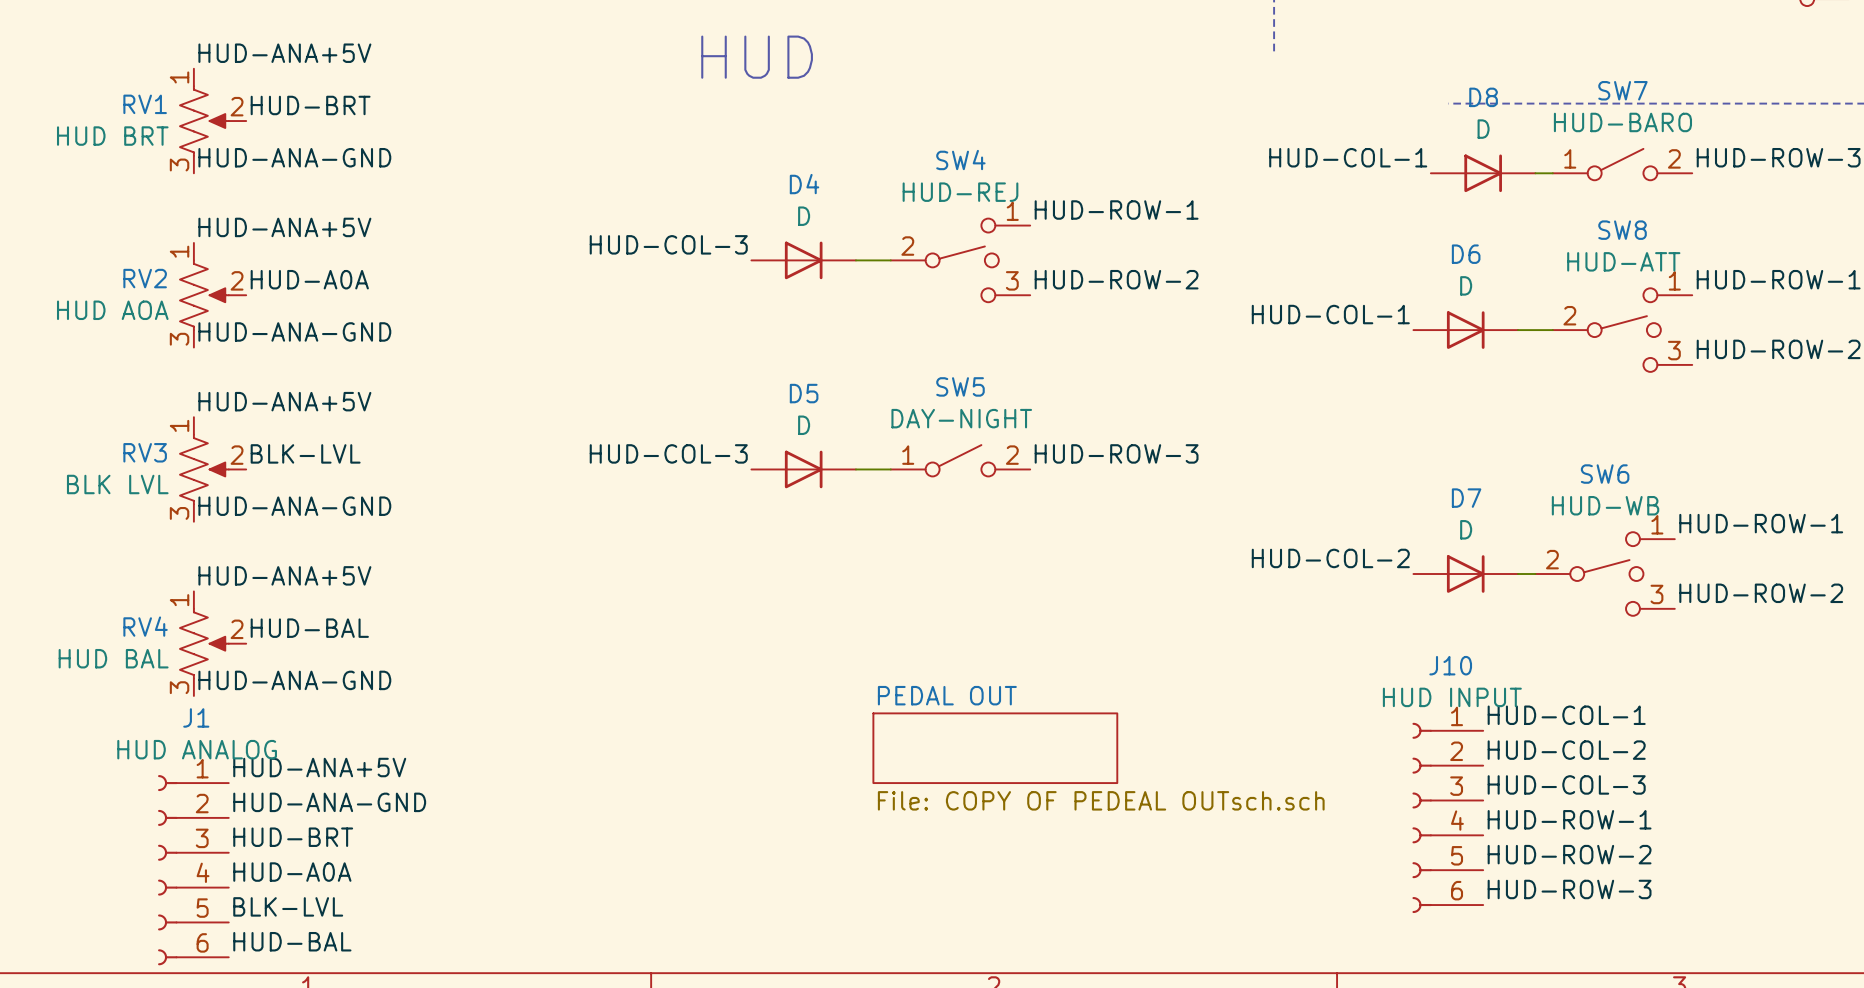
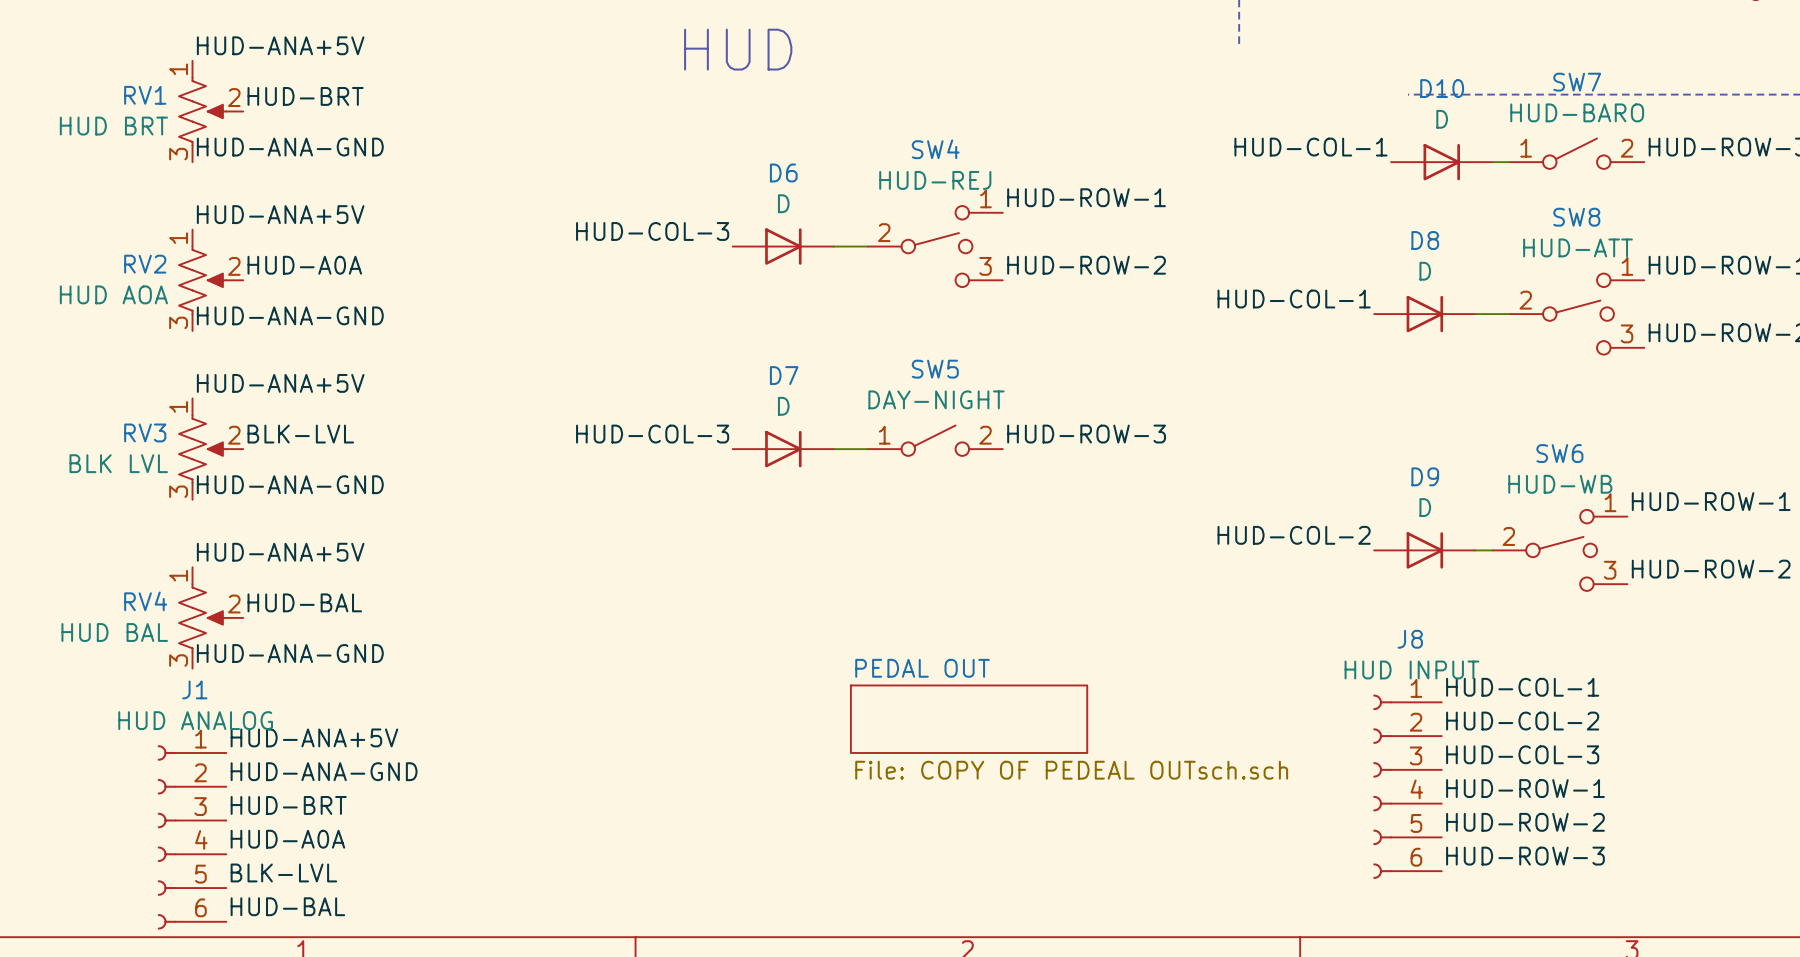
D8 name: D8 (1483, 97) -> D10 (1442, 88)
D4 name: D4 (804, 184) -> D6 (783, 172)
D6 name: D6 (1466, 254) -> D8 (1425, 240)
D5 name: D5 (804, 393) -> D7 (784, 375)
D7 name: D7 (1466, 498) -> D9 (1425, 476)
J10 name: J10 (1450, 665) -> J8 (1410, 639)

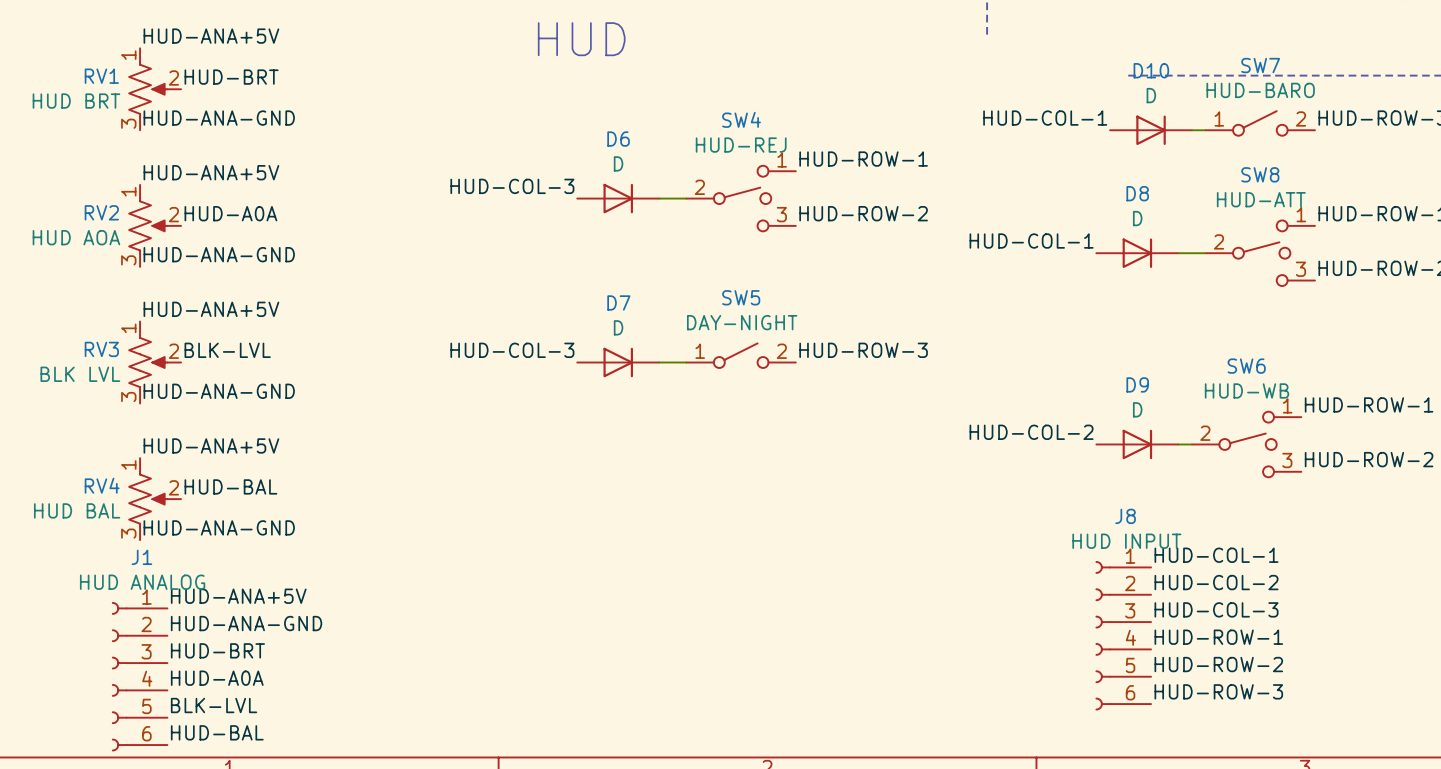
sheet PEDAL OUT: File: COPY OF PEDEAL OUTsch.sch (969, 719) -> none

